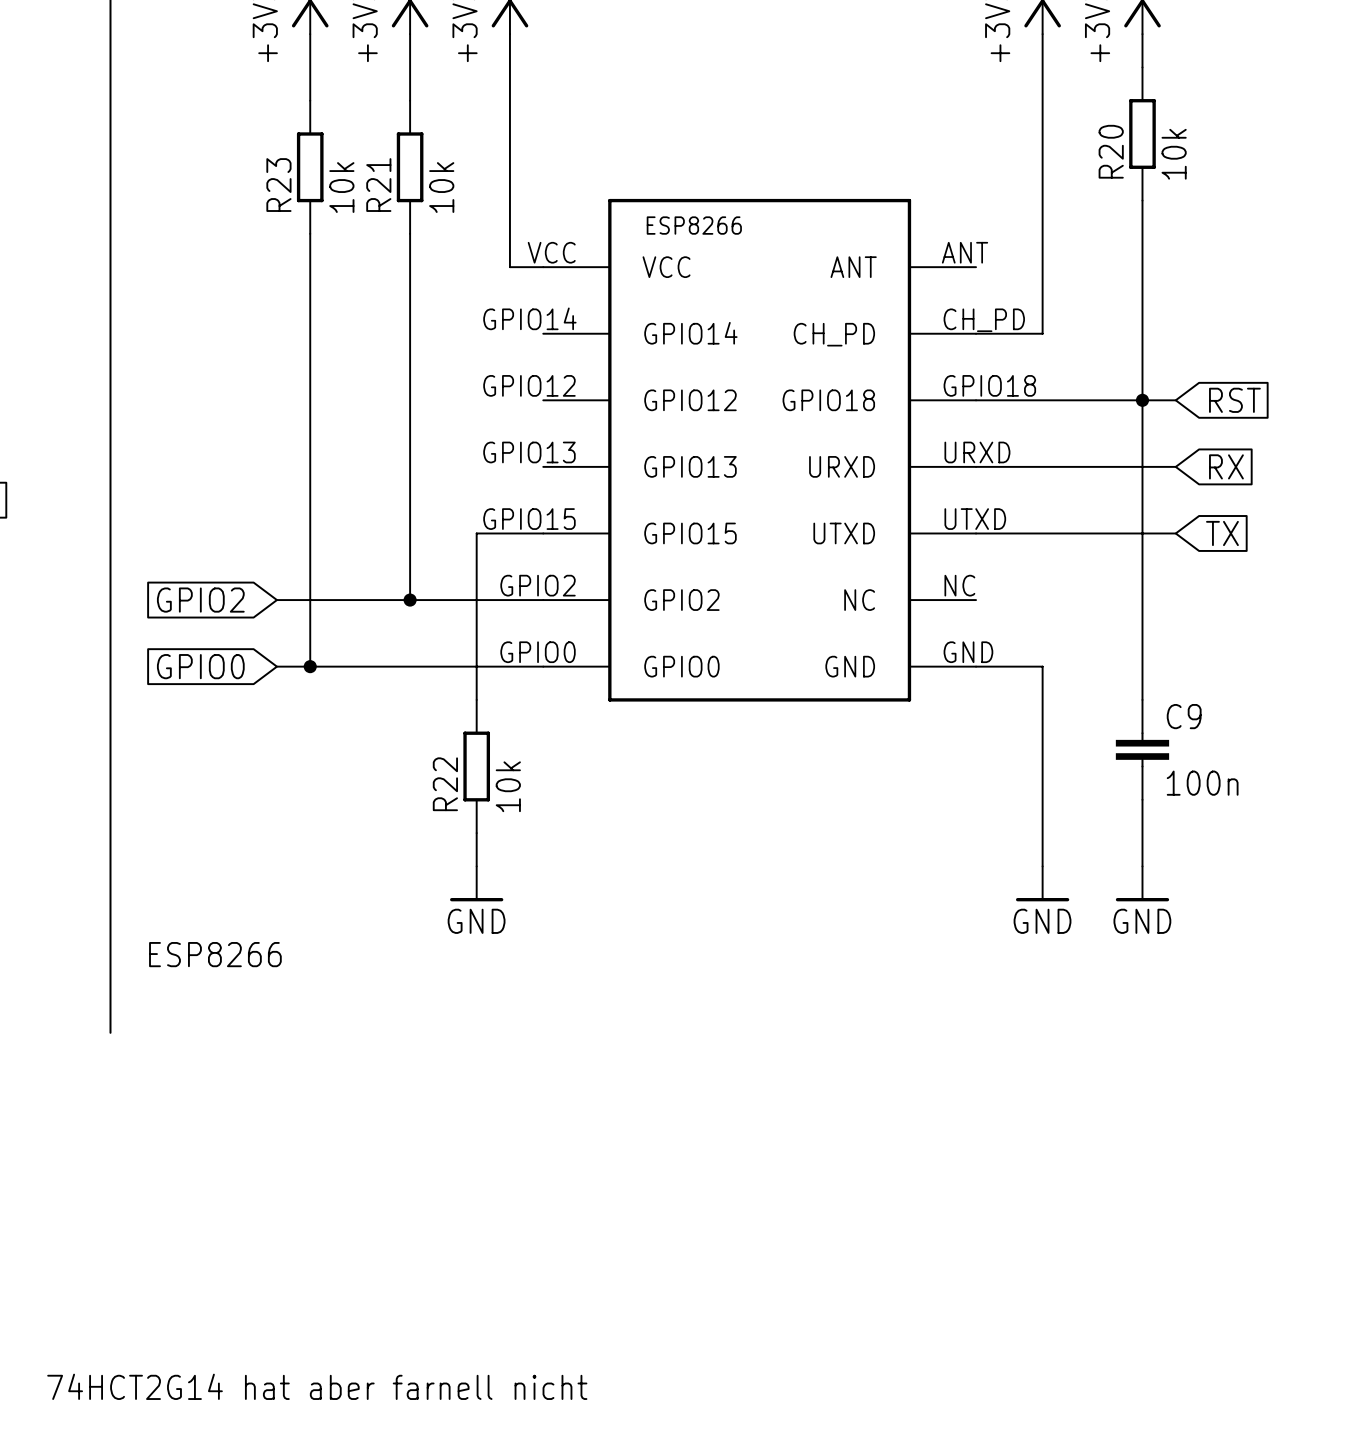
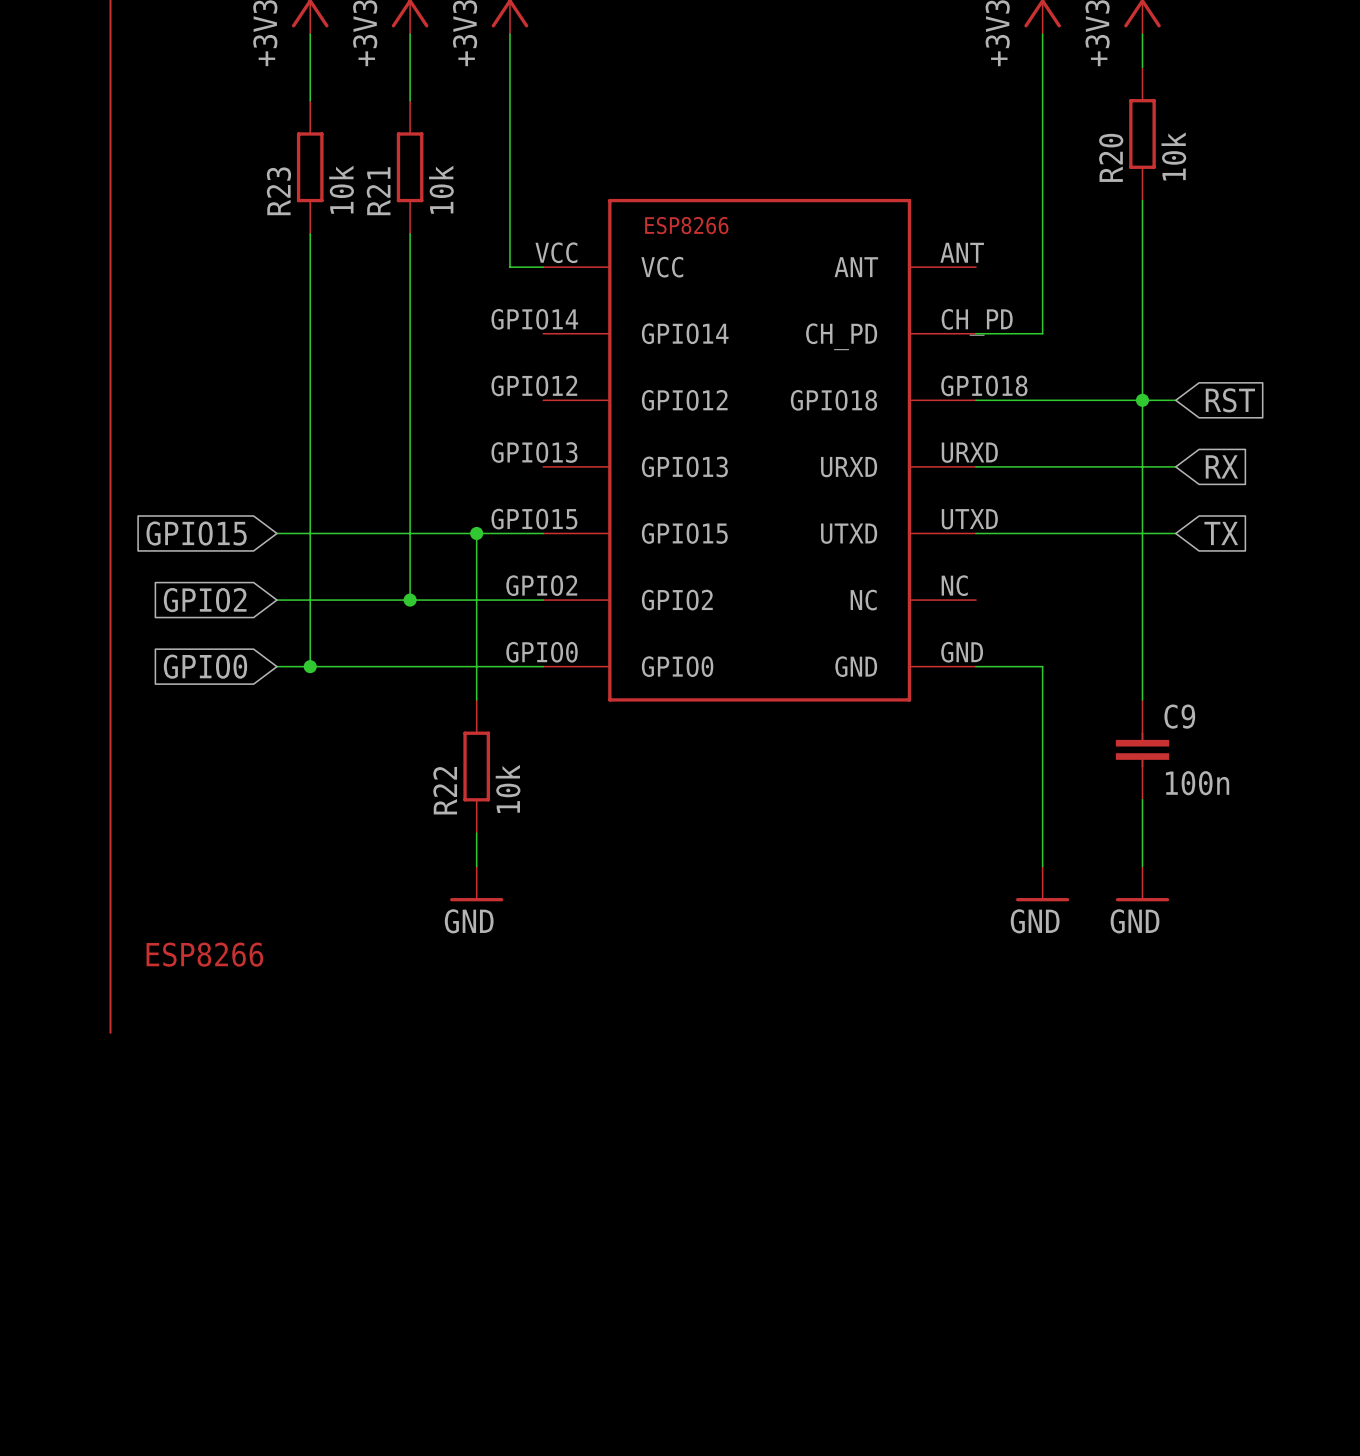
global label: none -> GPIO15 (196, 533)
wire: none -> (276, 533) (476, 533)
junction: none -> (476, 533)
text: 74HCT2G14 hat aber farnell nicht (317, 1386) -> none

